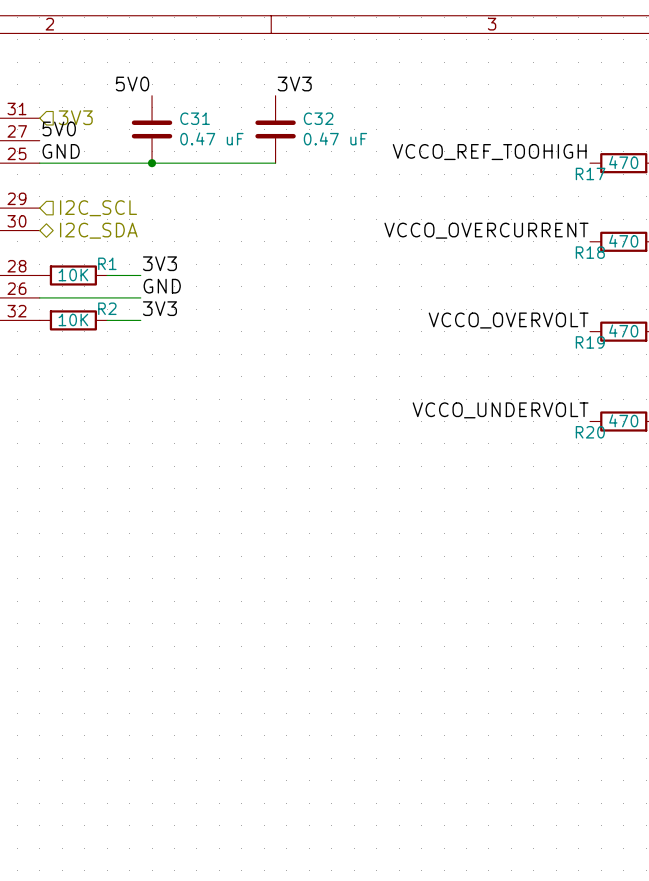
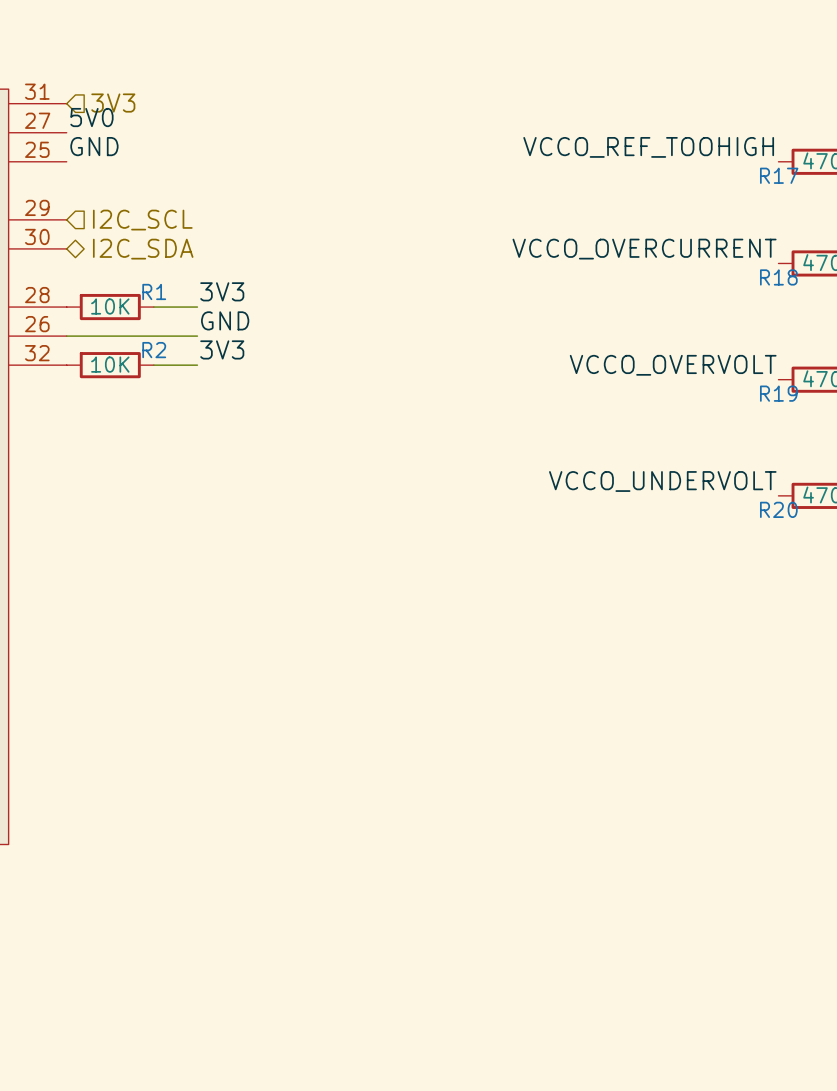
label: 5V0 (132, 84) -> none
label: 3V3 (294, 84) -> none
C31: 0.47 uF (152, 129) -> none
C32: 0.47 uF (275, 129) -> none
wire: (39, 163) (275, 163) -> none
junction: (152, 163) -> none

